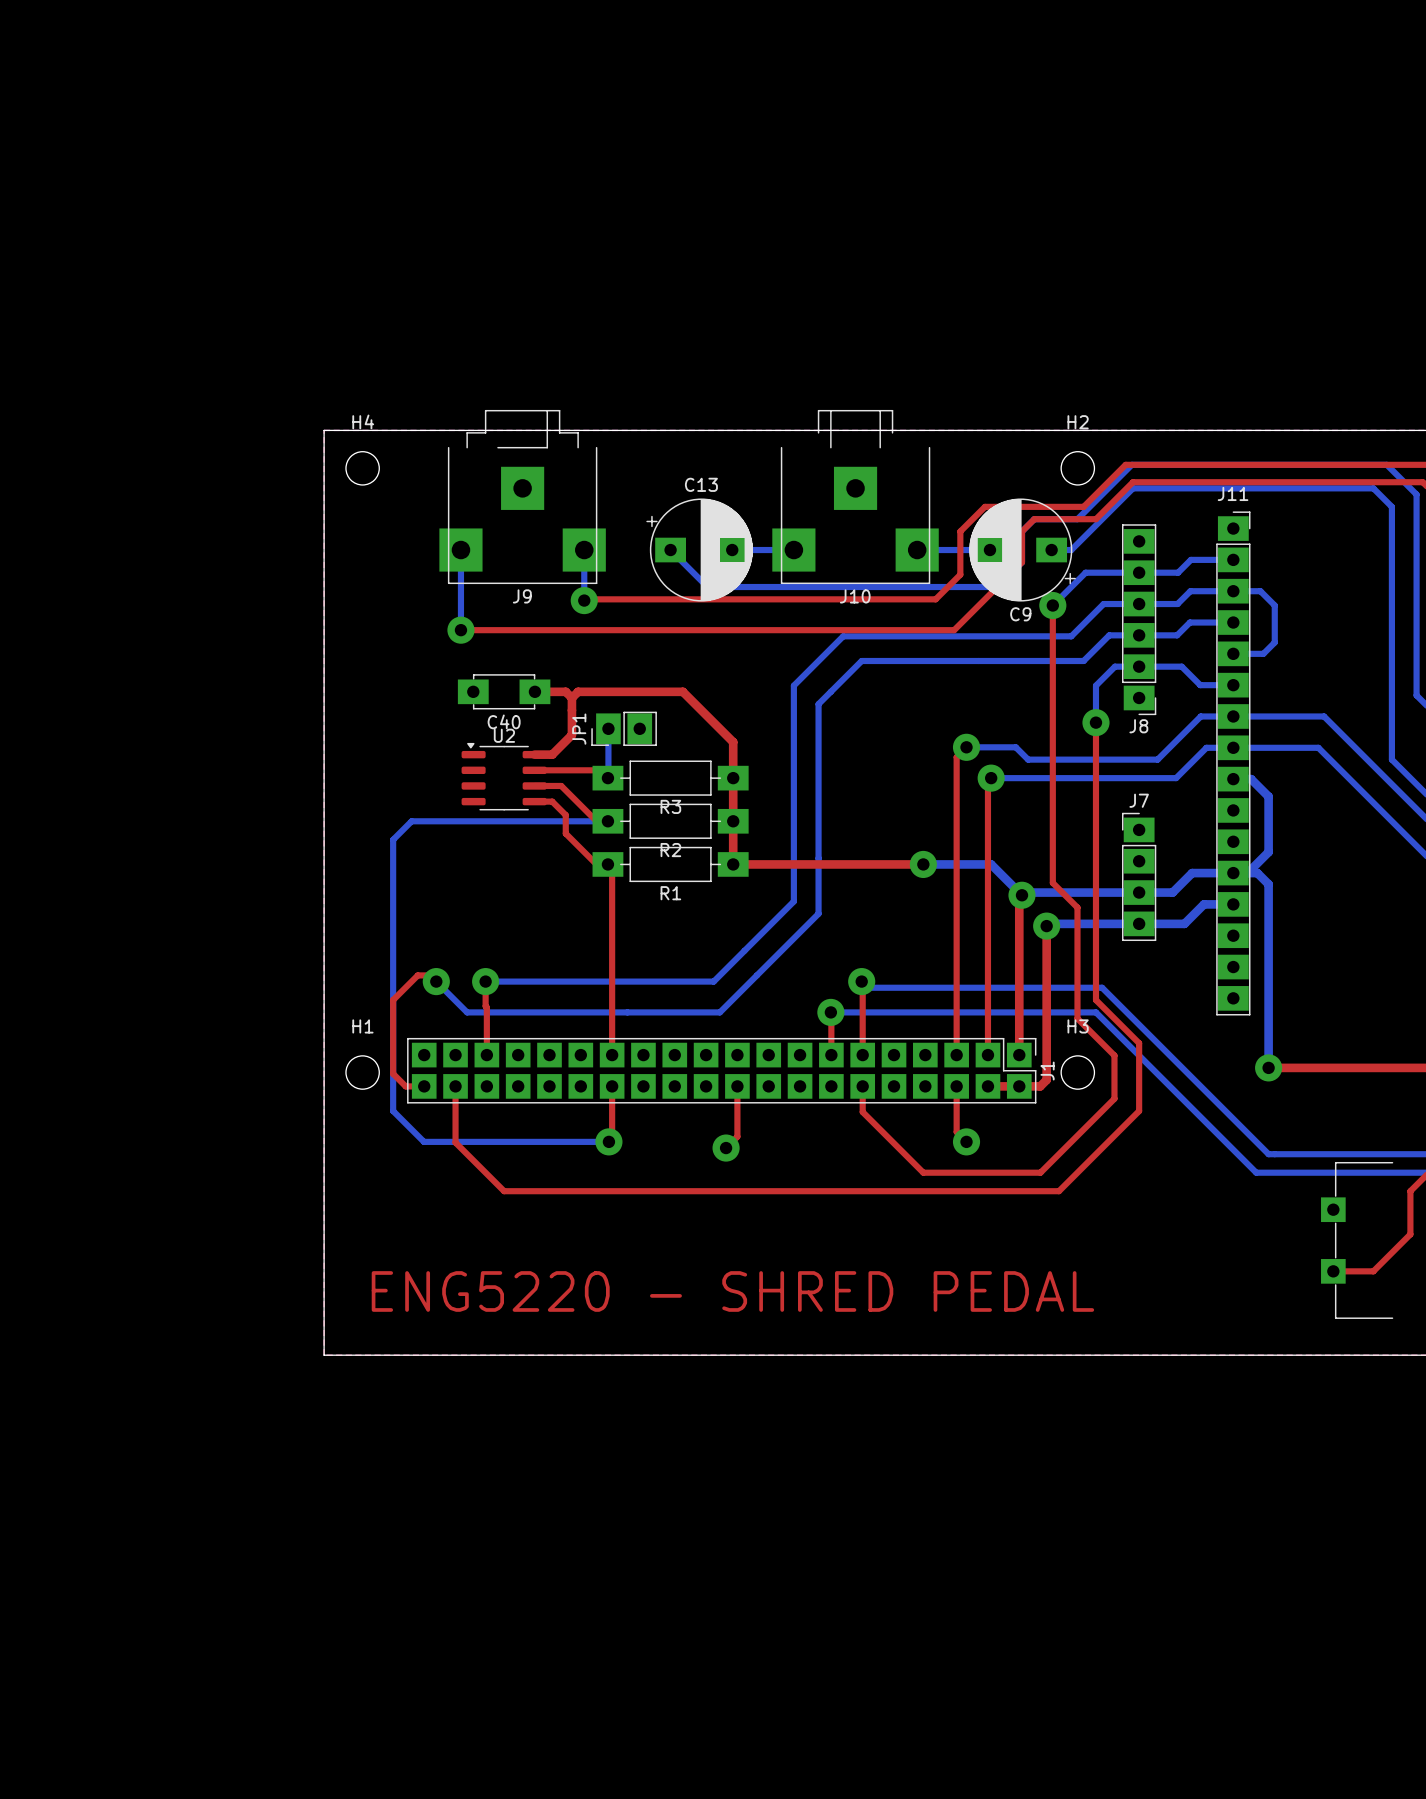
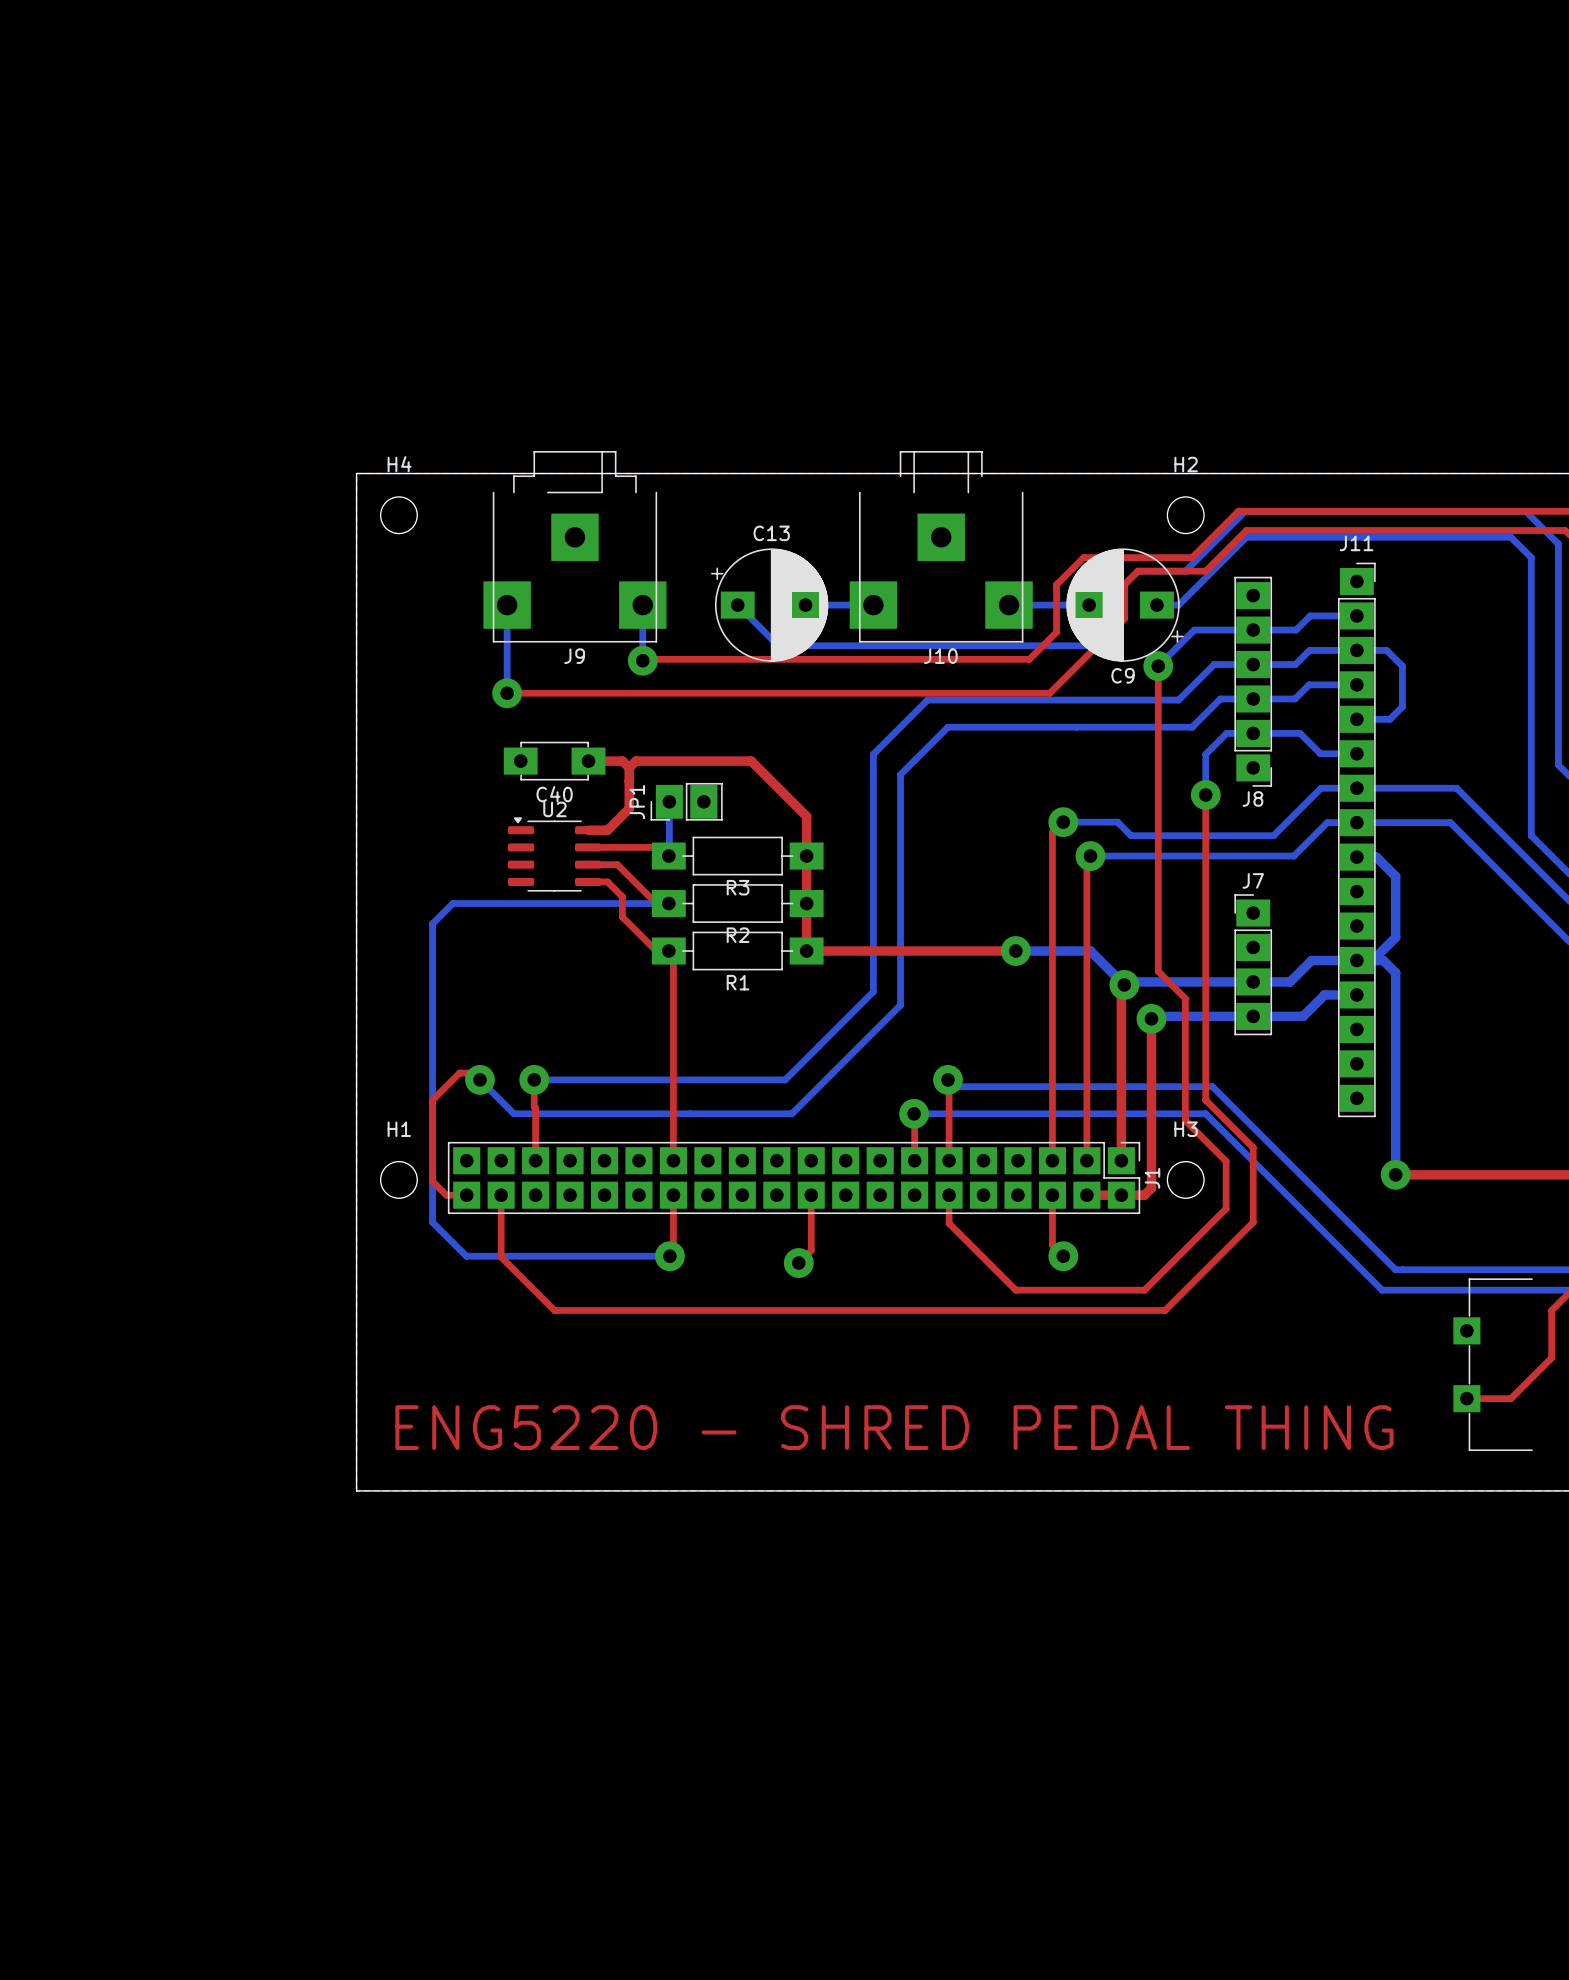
text: ENG5220 - SHRED PEDAL (732, 1291) -> ENG5220 - SHRED PEDAL THING (894, 1427)

